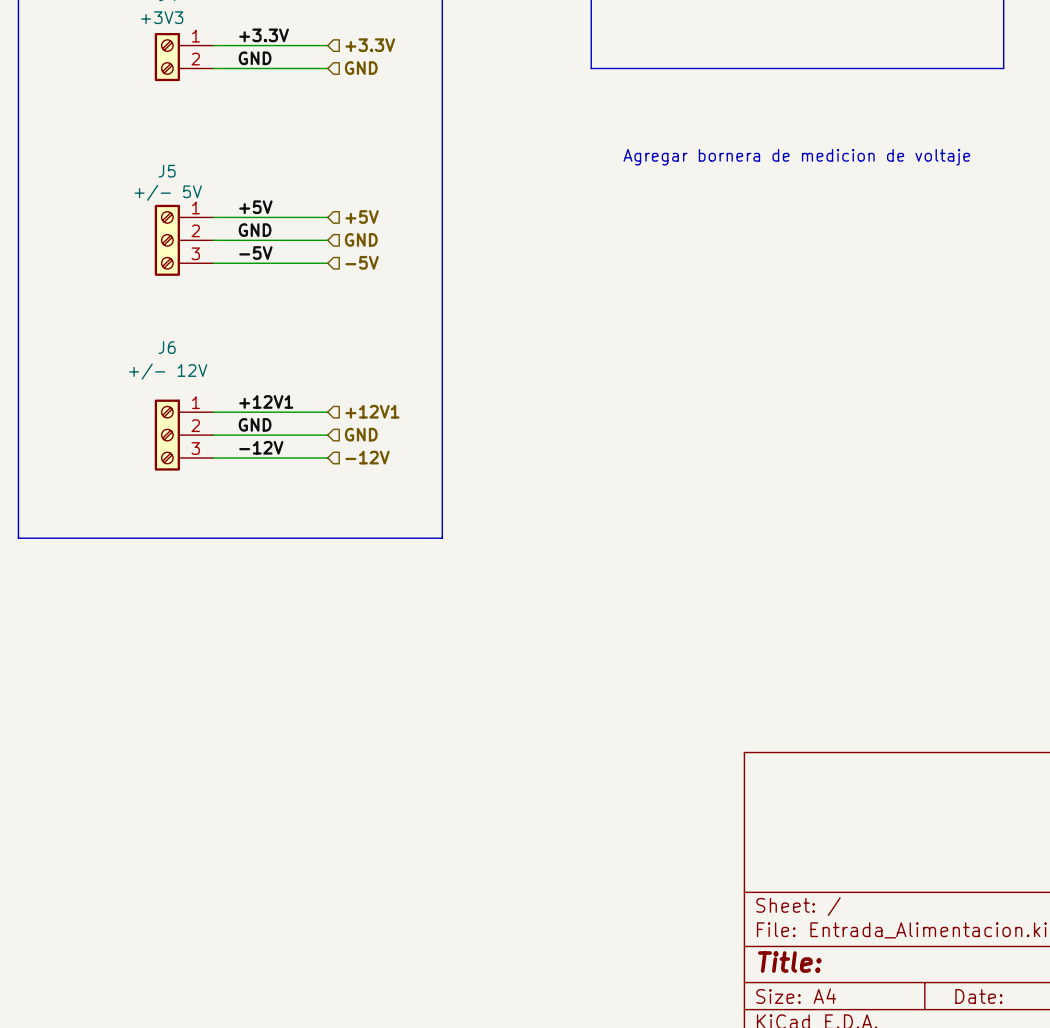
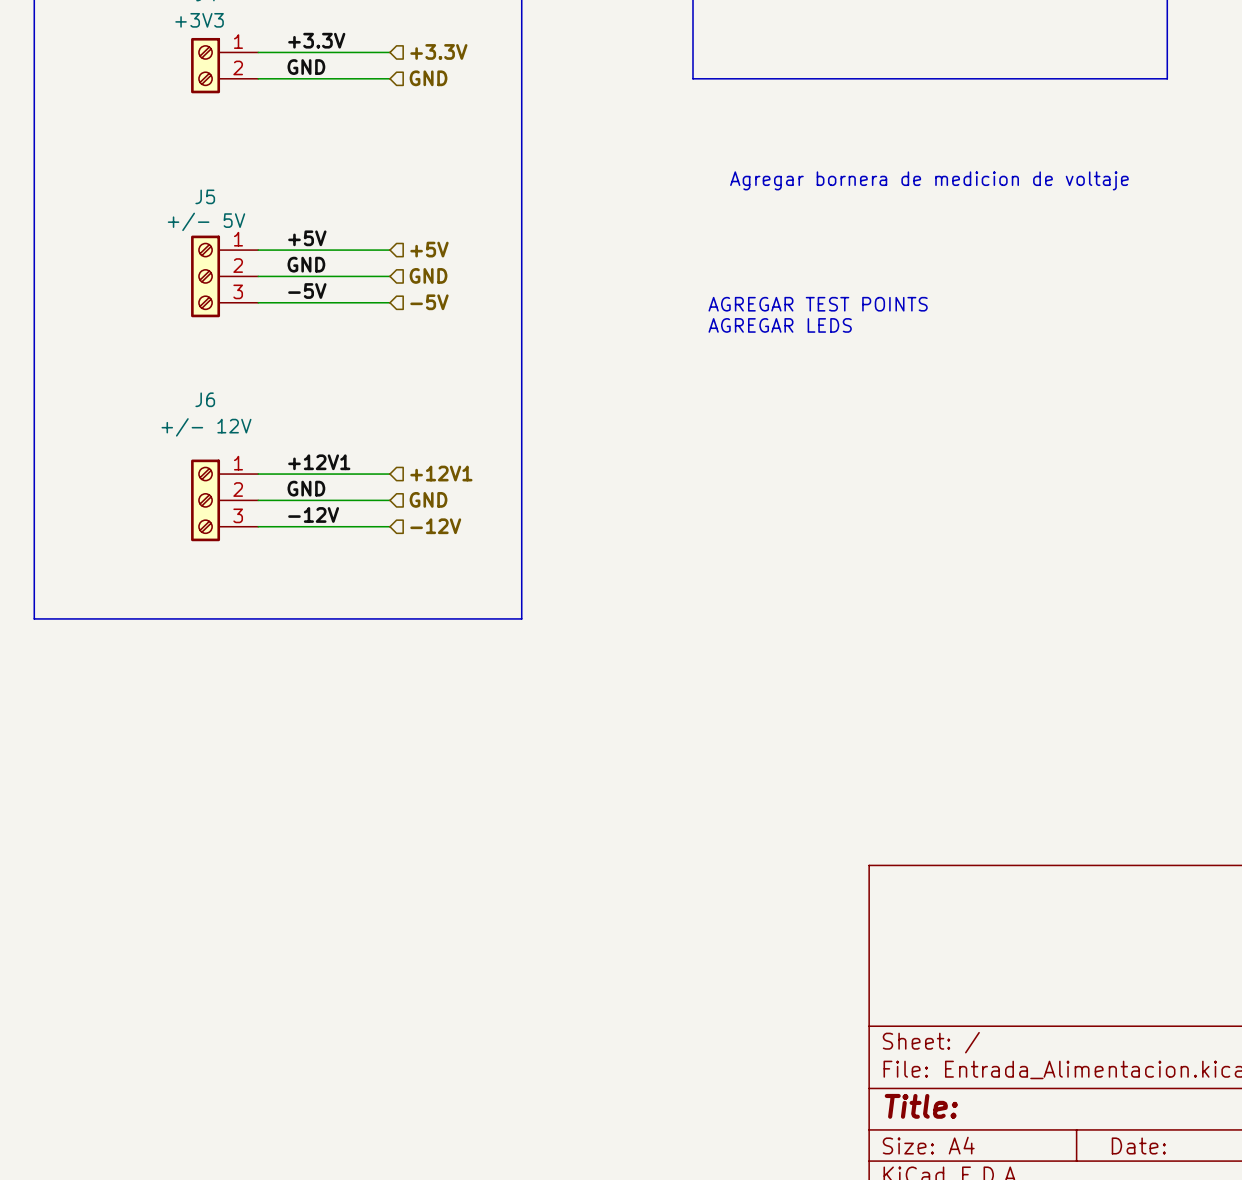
text: none -> AGREGAR TEST POINTS (818, 304)
text: none -> AGREGAR LEDS (780, 325)

